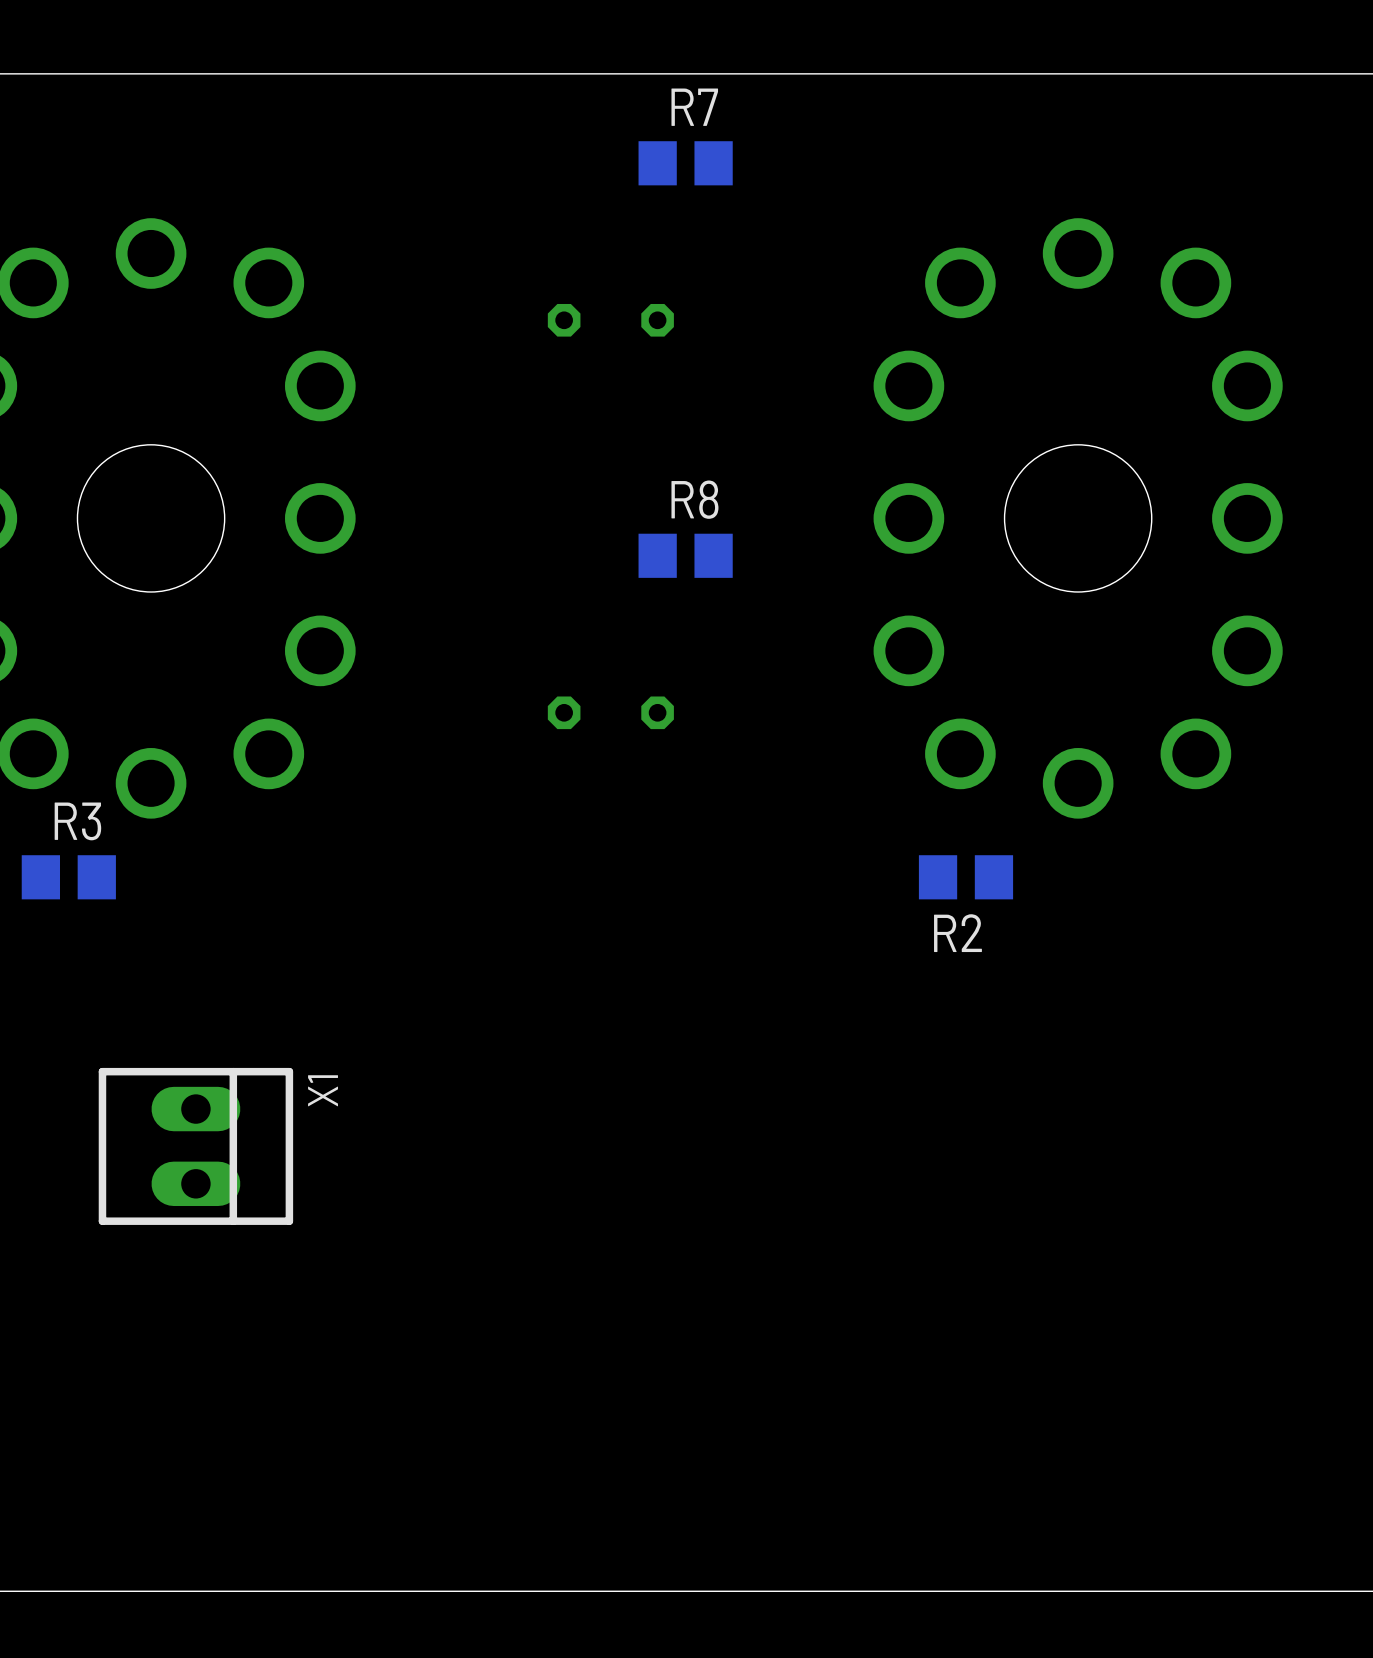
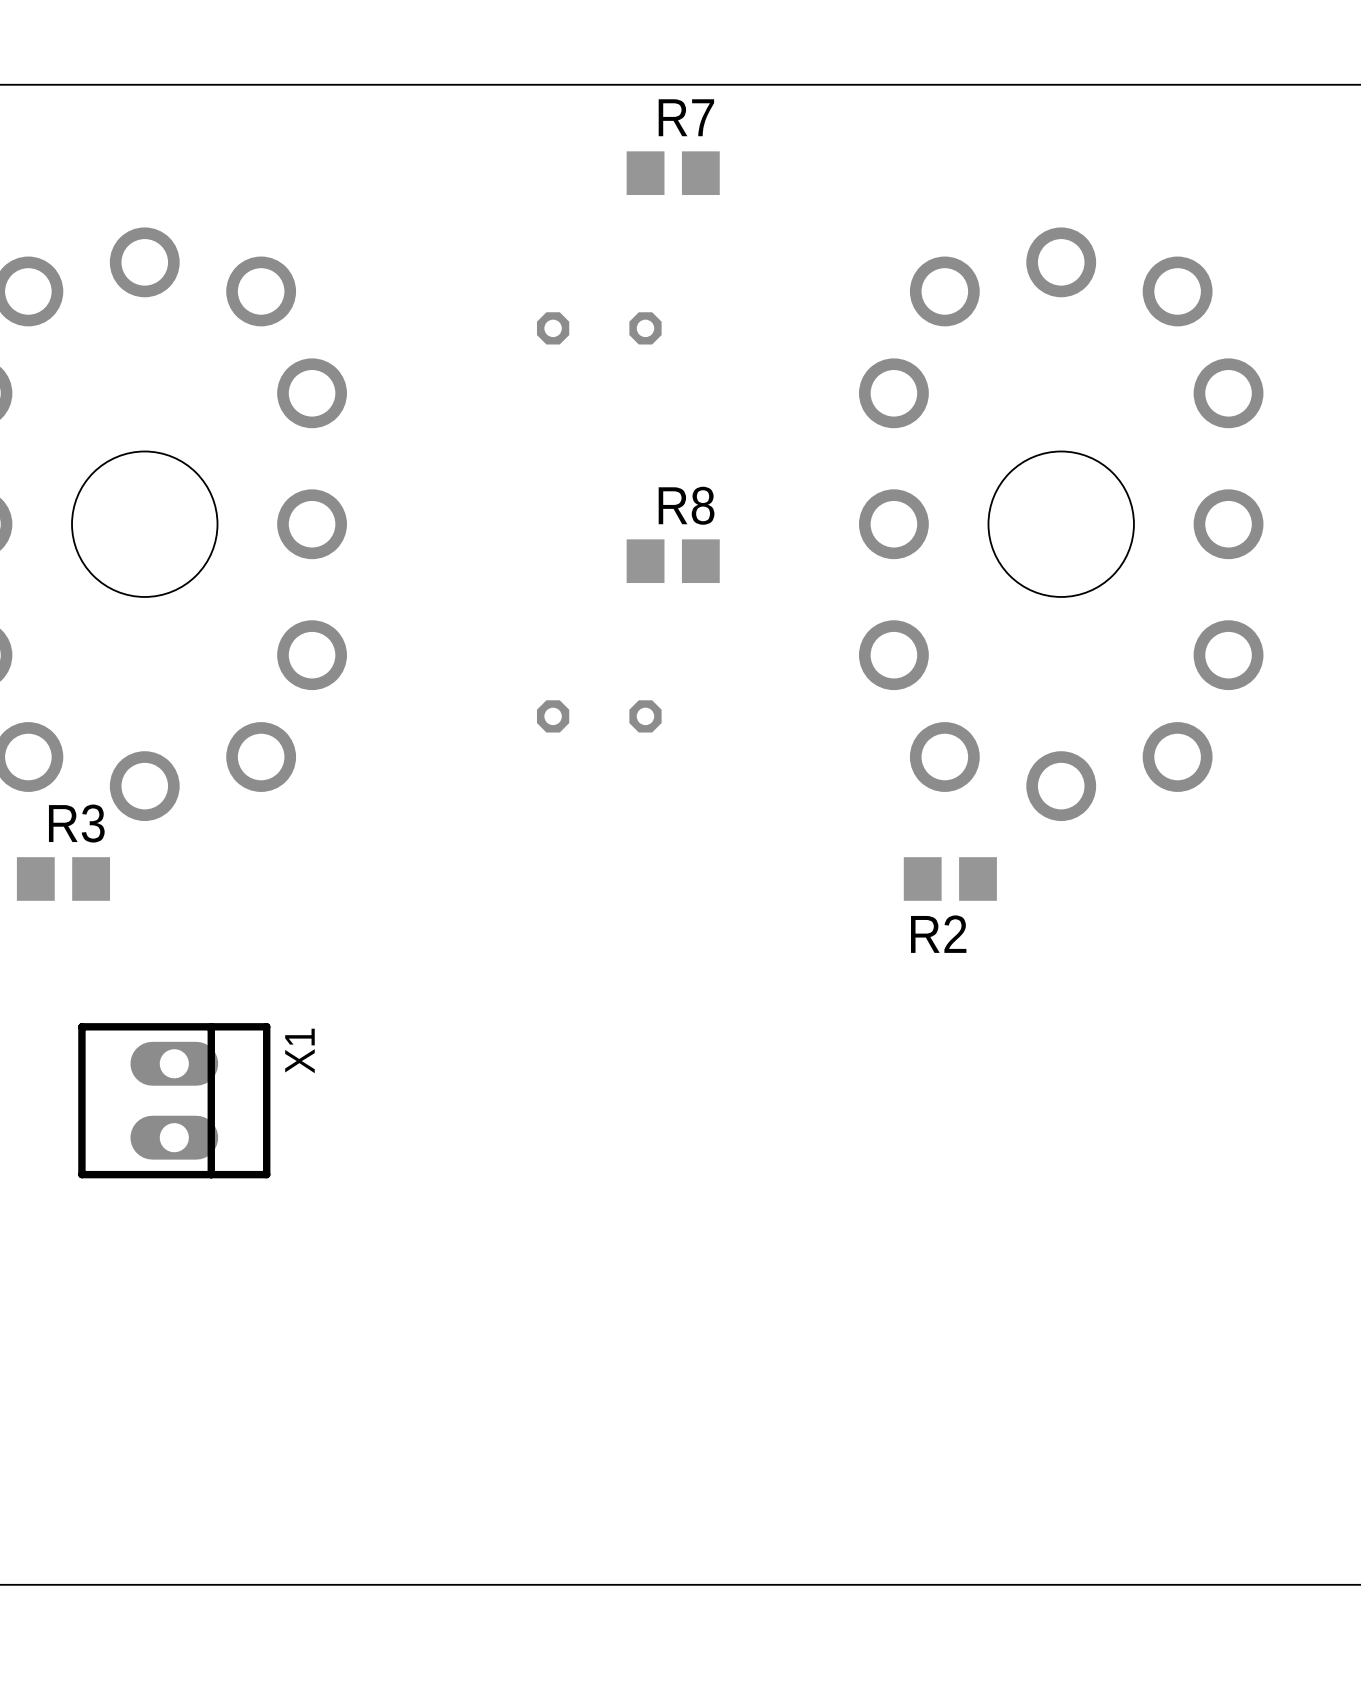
X1 position: (195, 1146) -> (174, 1100)

